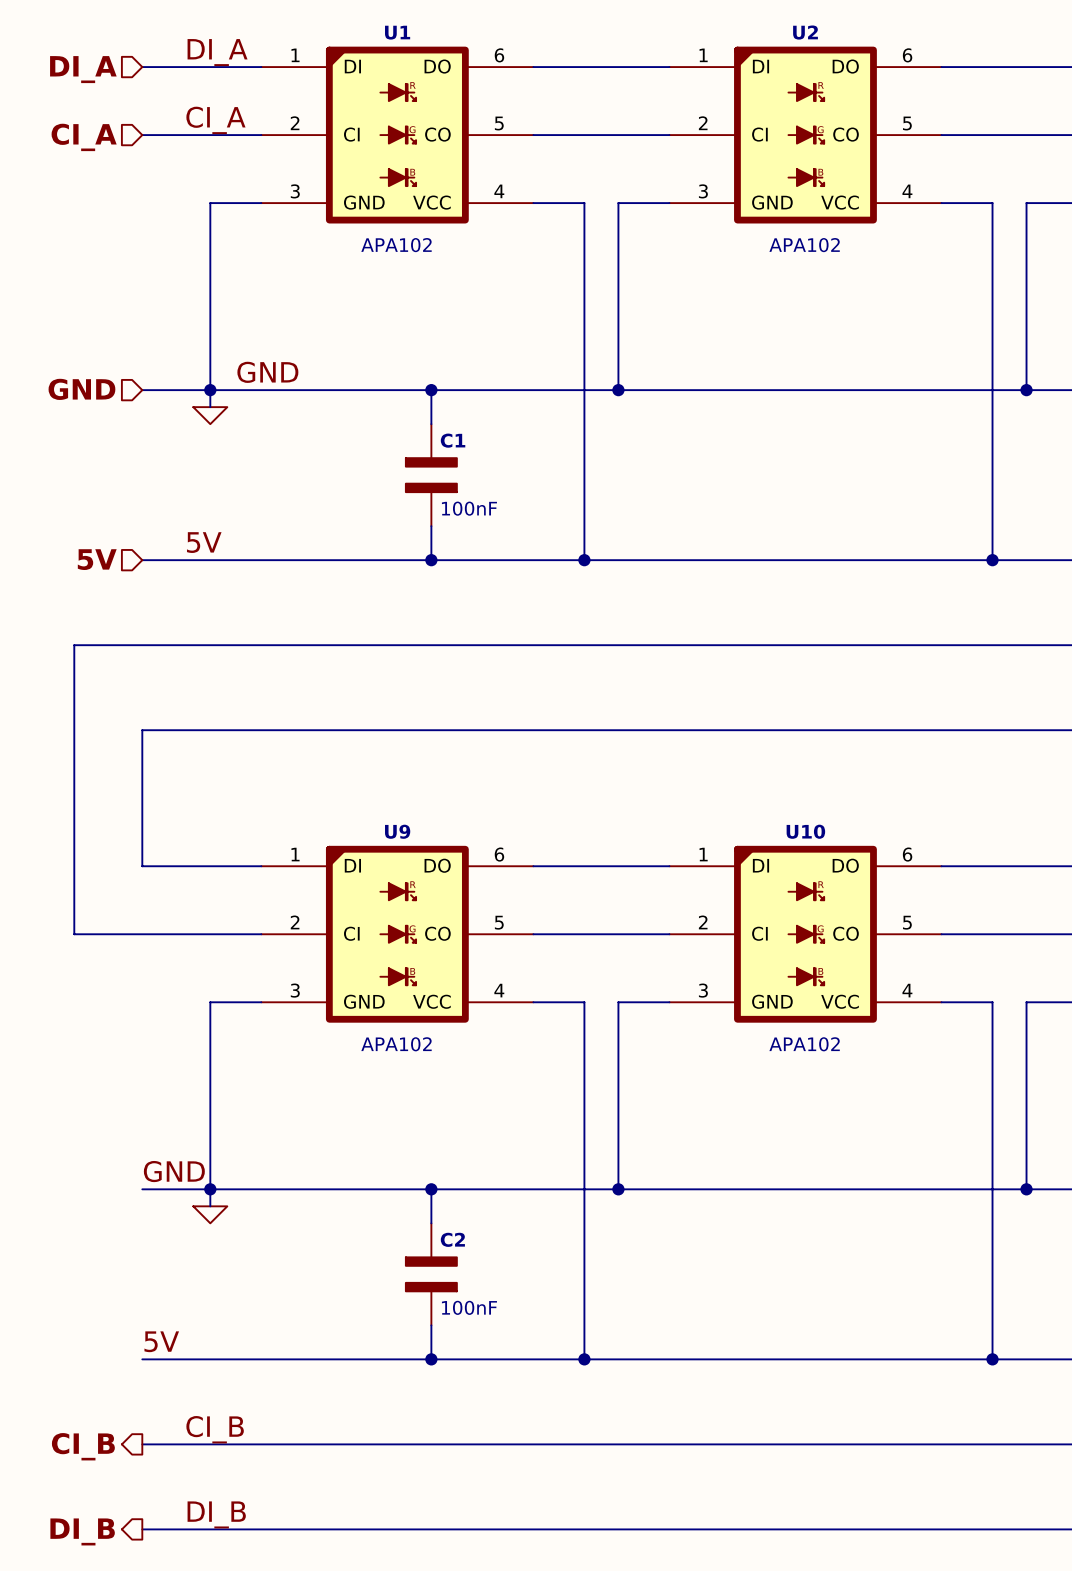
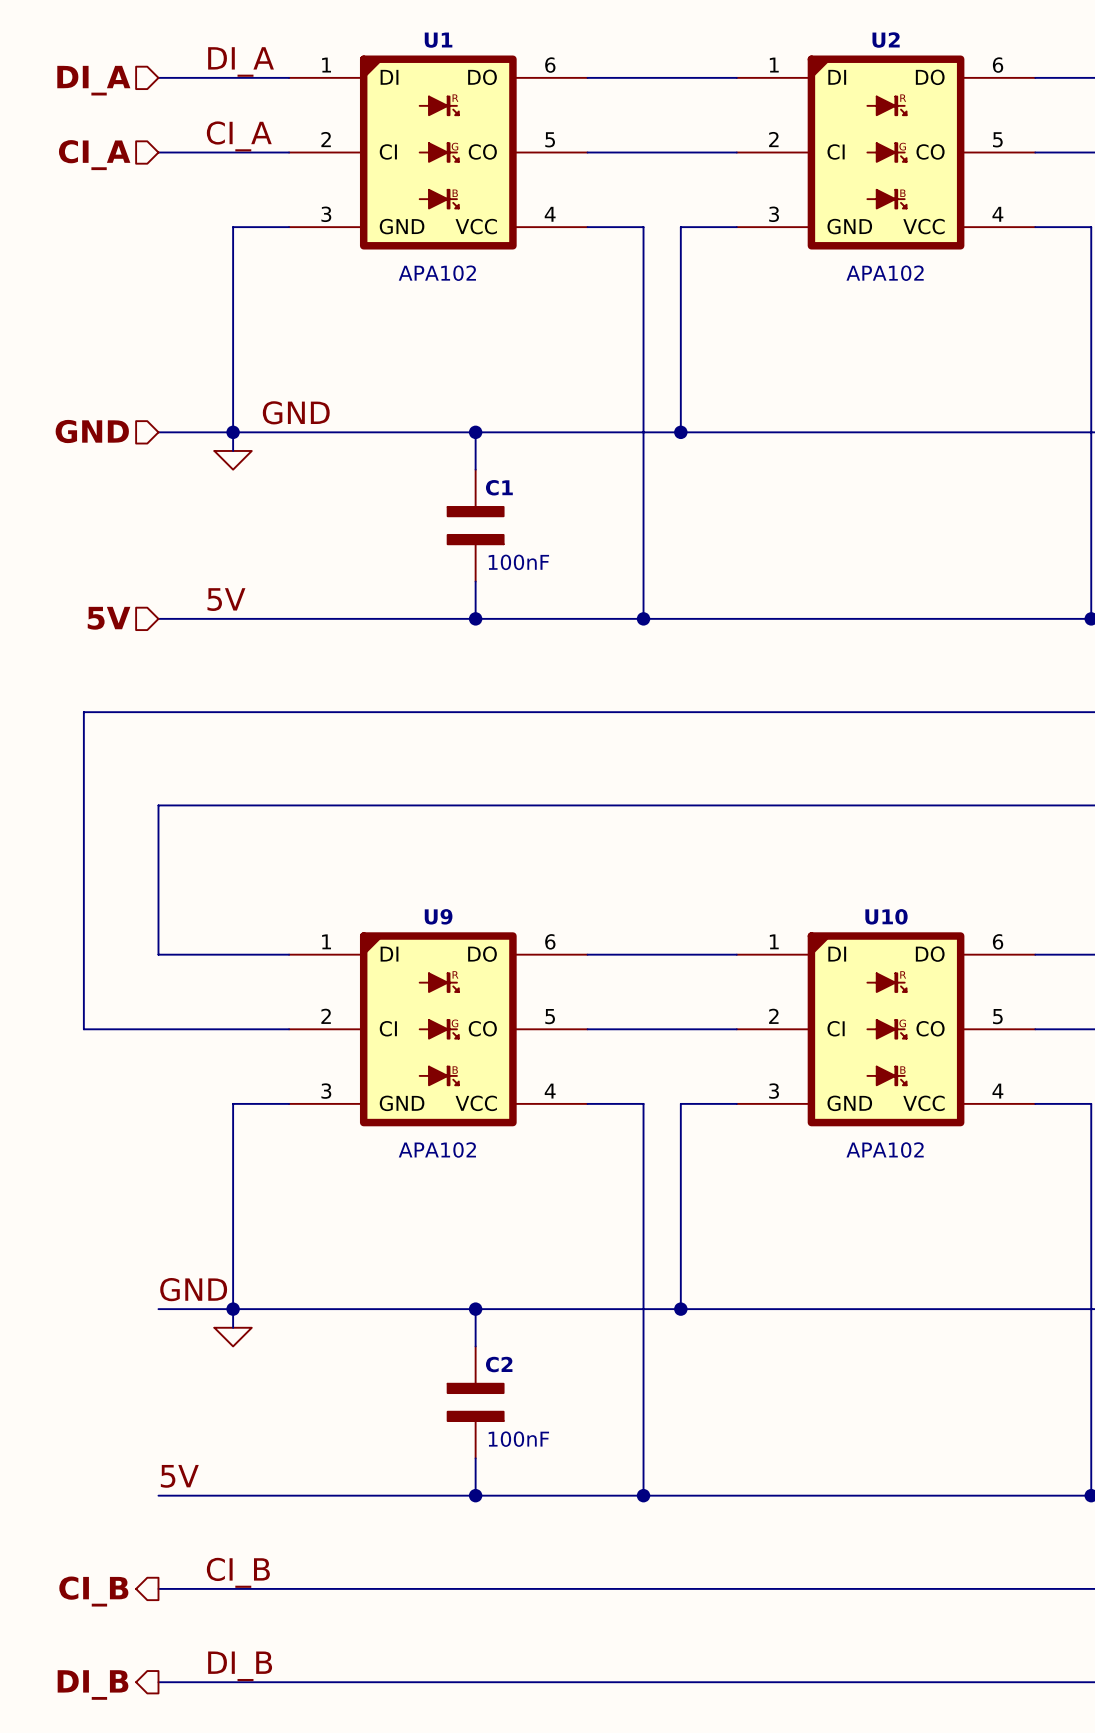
C1 value position: 100nF (469, 508) -> 100nF (518, 562)
C2 value position: 100nF (469, 1307) -> 100nF (518, 1439)

